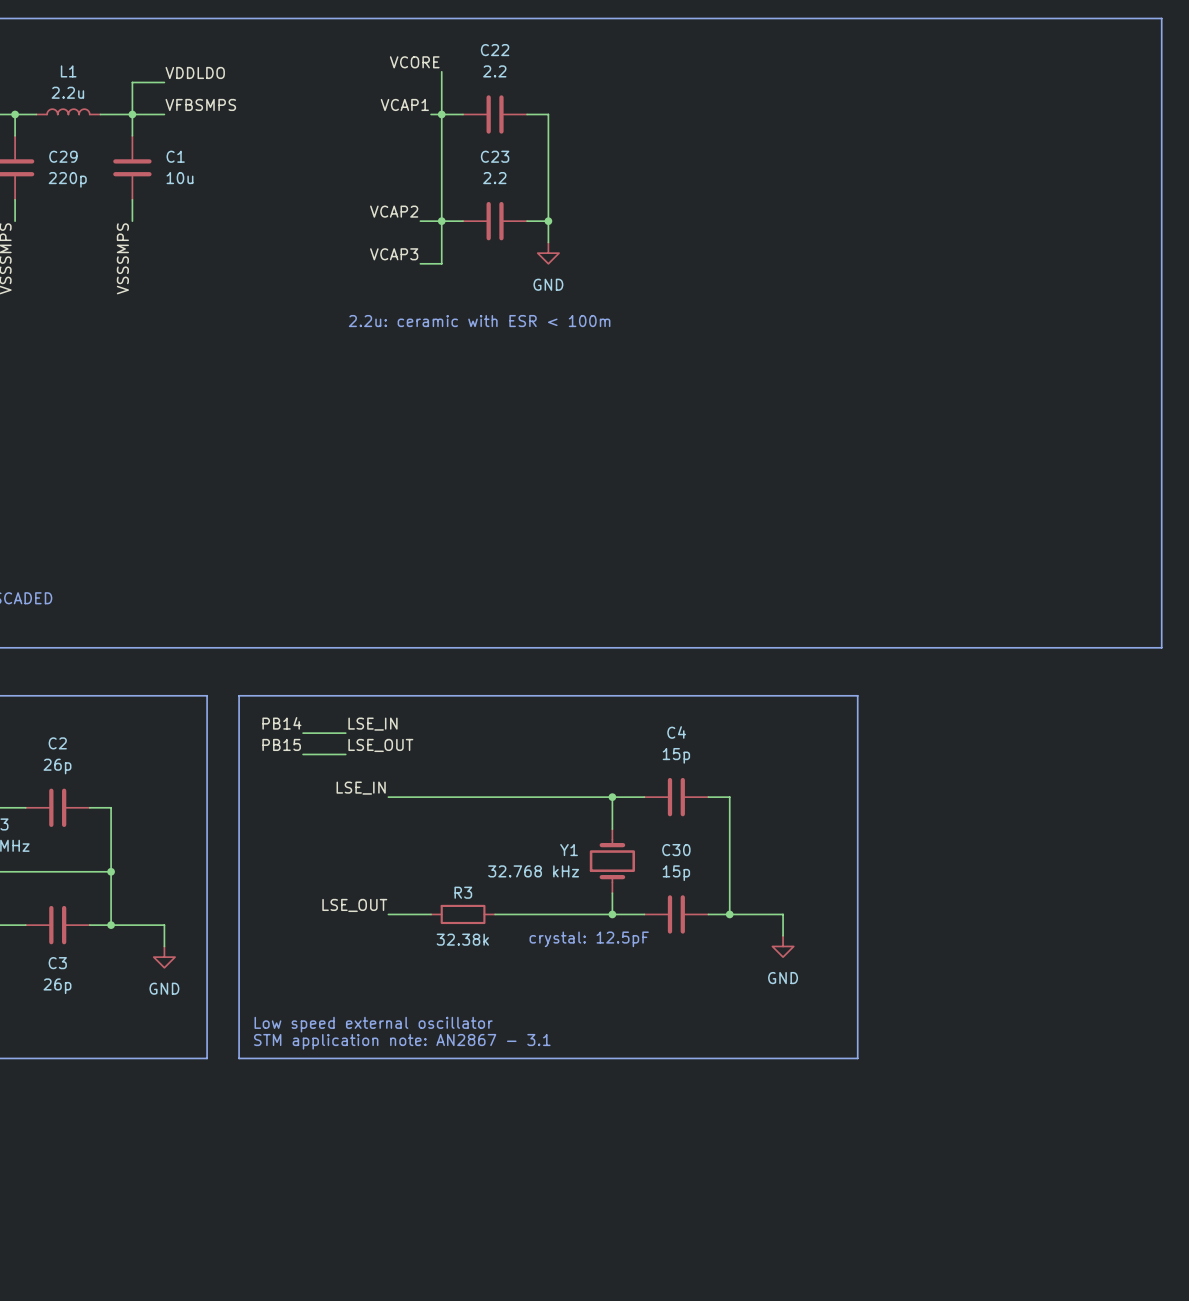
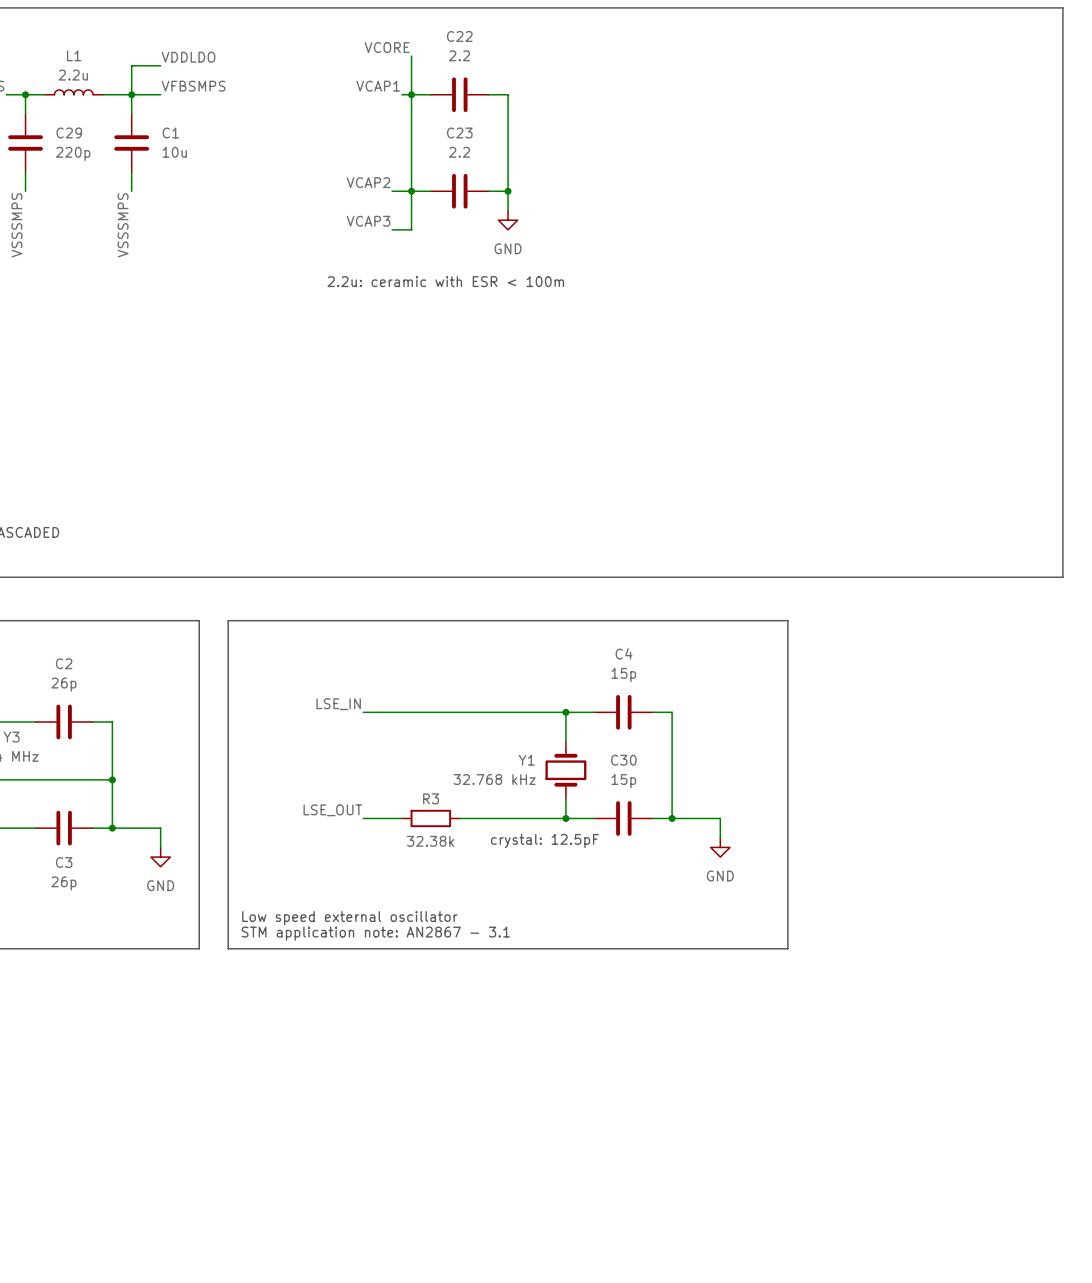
label: PB14 (281, 723) -> none
label: LSE_IN (372, 724) -> none
wire: (303, 733) (345, 733) -> none
label: PB15 (281, 744) -> none
label: LSE_OUT (380, 745) -> none
wire: (303, 754) (345, 754) -> none

